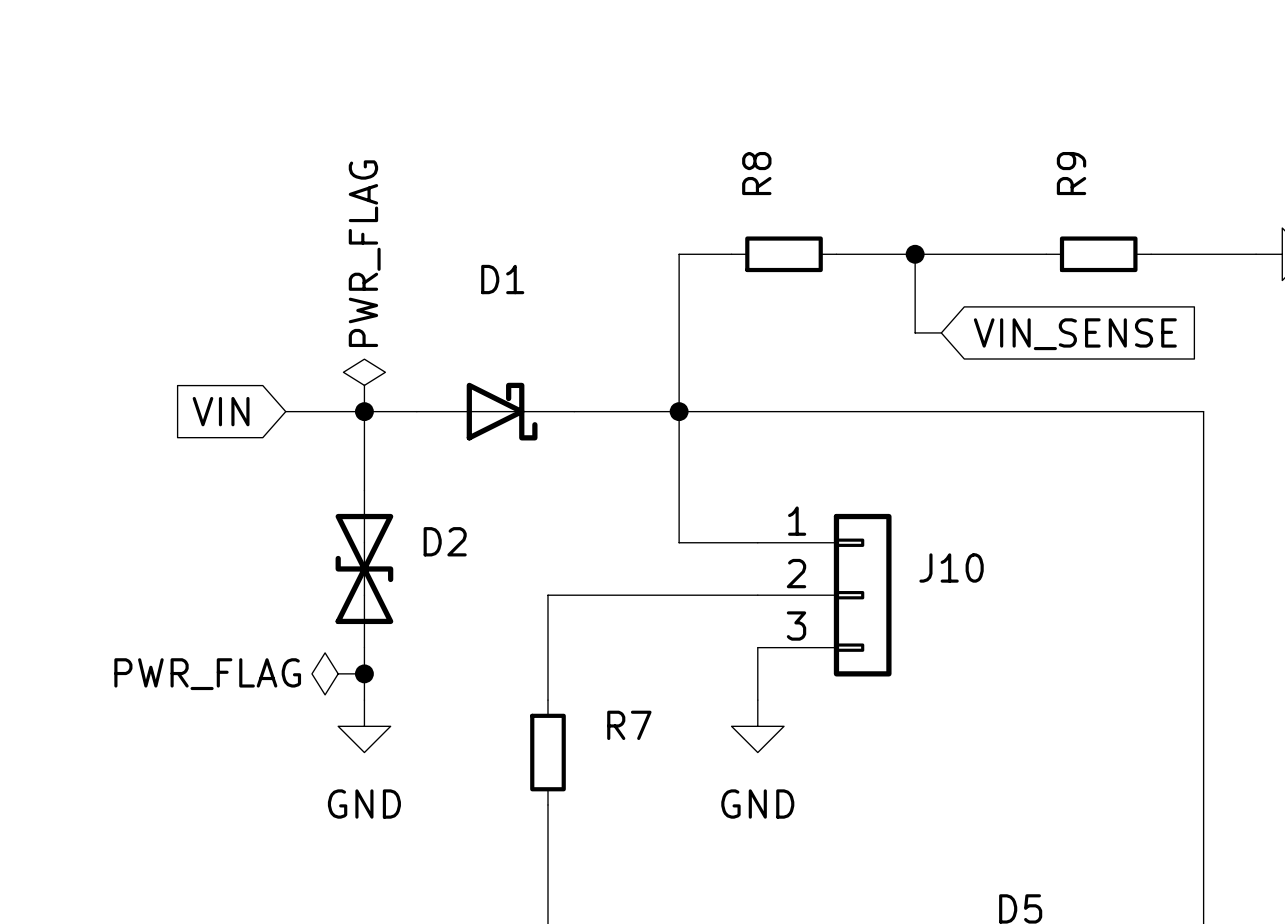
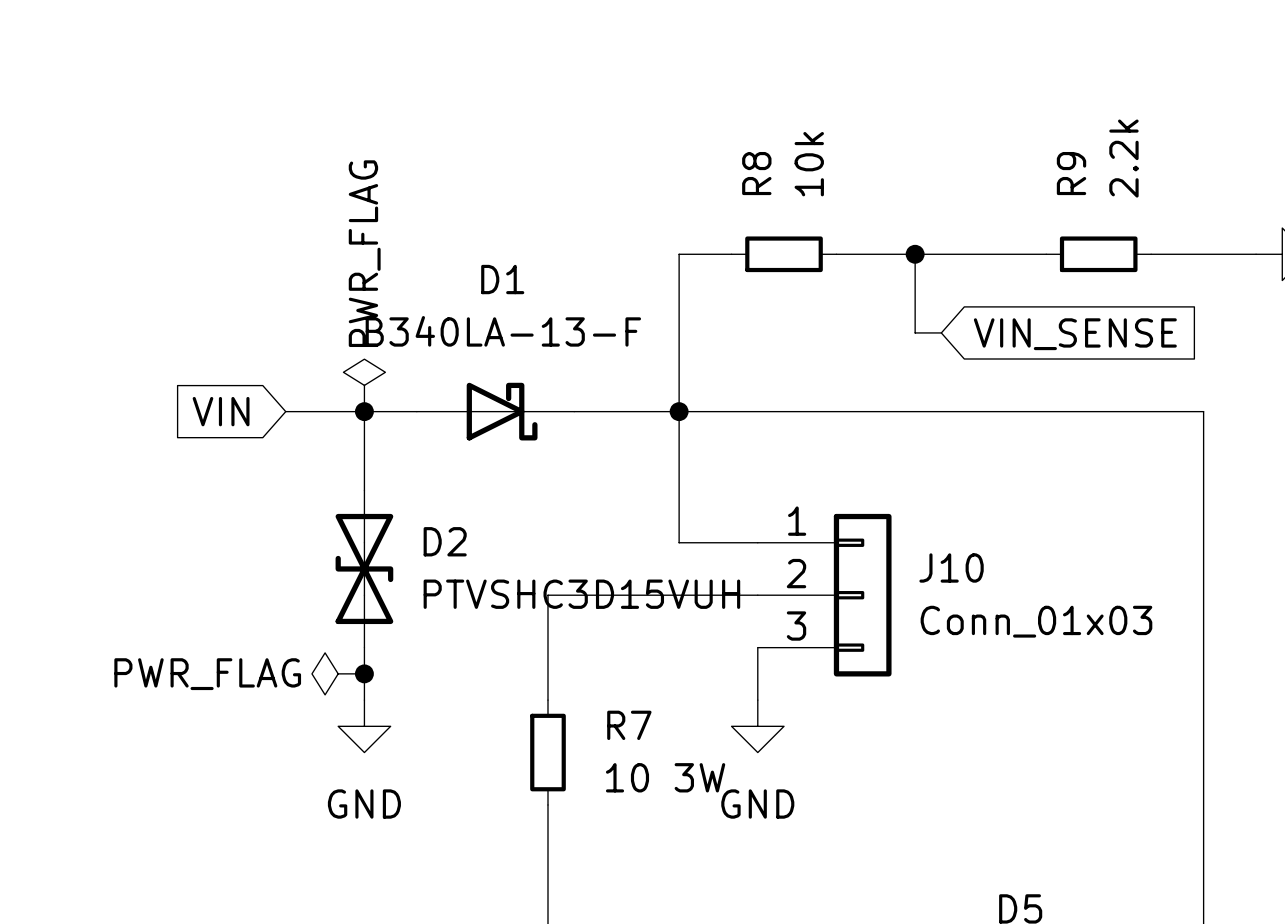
R9 value: none -> 2.2k (1123, 158)
R8 value: none -> 10k (809, 164)
D1 value: none -> B340LA-13-F (503, 331)
D2 value: none -> PTVSHC3D15VUH (581, 594)
J10 value: none -> Conn_01x03 (1036, 621)
R7 value: none -> 10 3W (665, 777)

